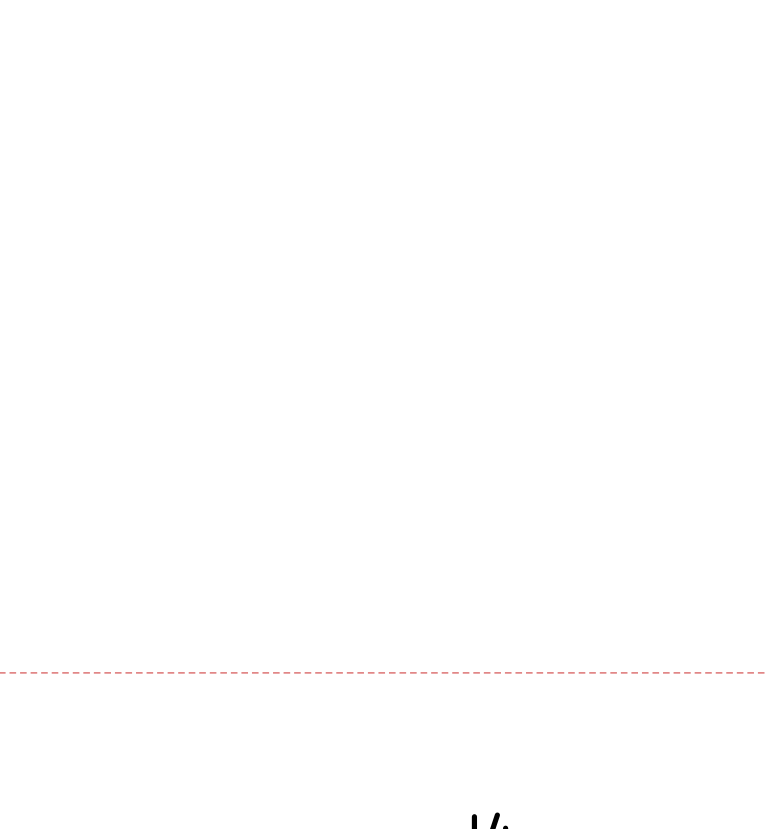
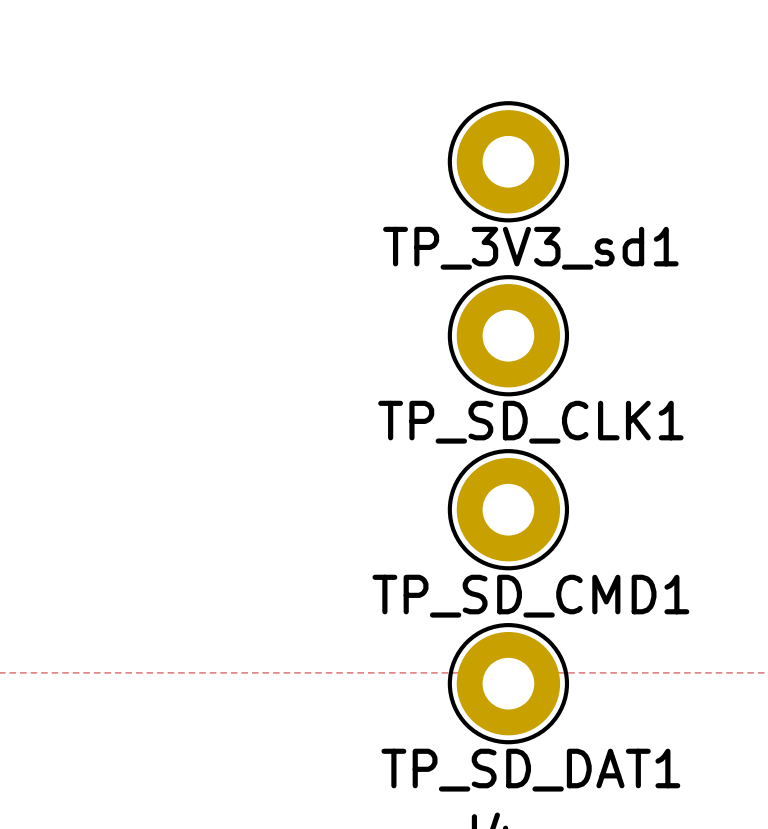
TP_3V3_sd1: none -> (508, 161)
TP_SD_CLK1: none -> (508, 335)
TP_SD_CMD1: none -> (508, 509)
TP_SD_DAT1: none -> (508, 683)

